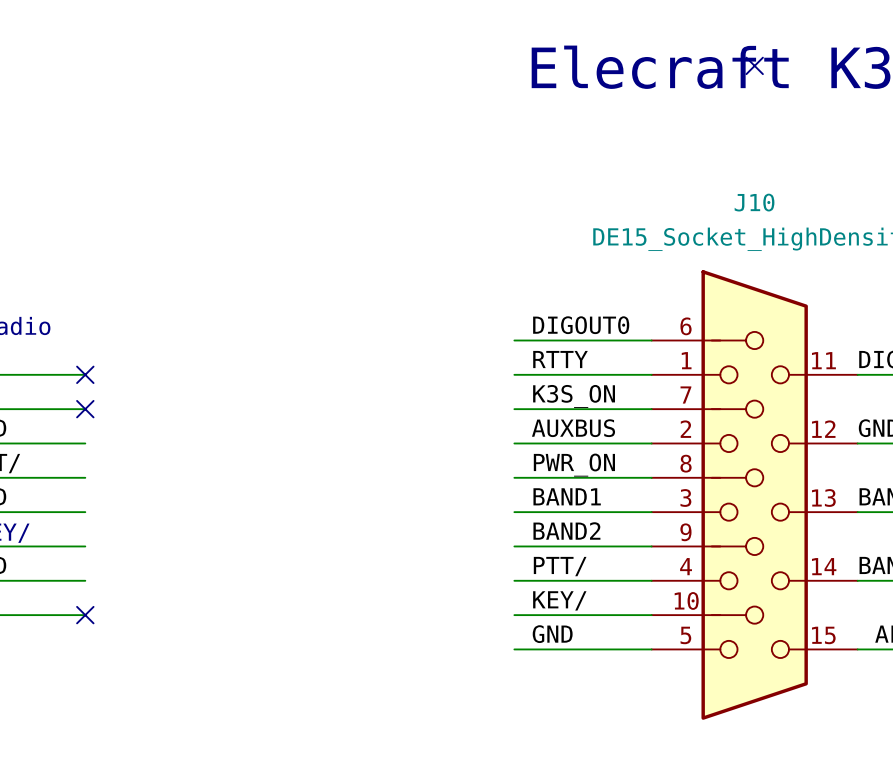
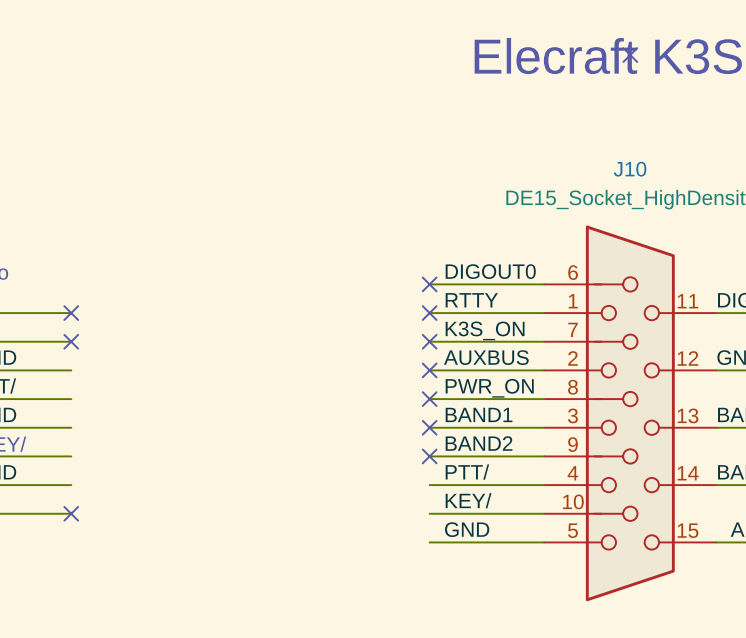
no-connect mark: none -> (429, 284)
no-connect mark: none -> (429, 313)
no-connect mark: none -> (429, 341)
no-connect mark: none -> (429, 370)
no-connect mark: none -> (429, 399)
no-connect mark: none -> (429, 427)
no-connect mark: none -> (429, 456)

